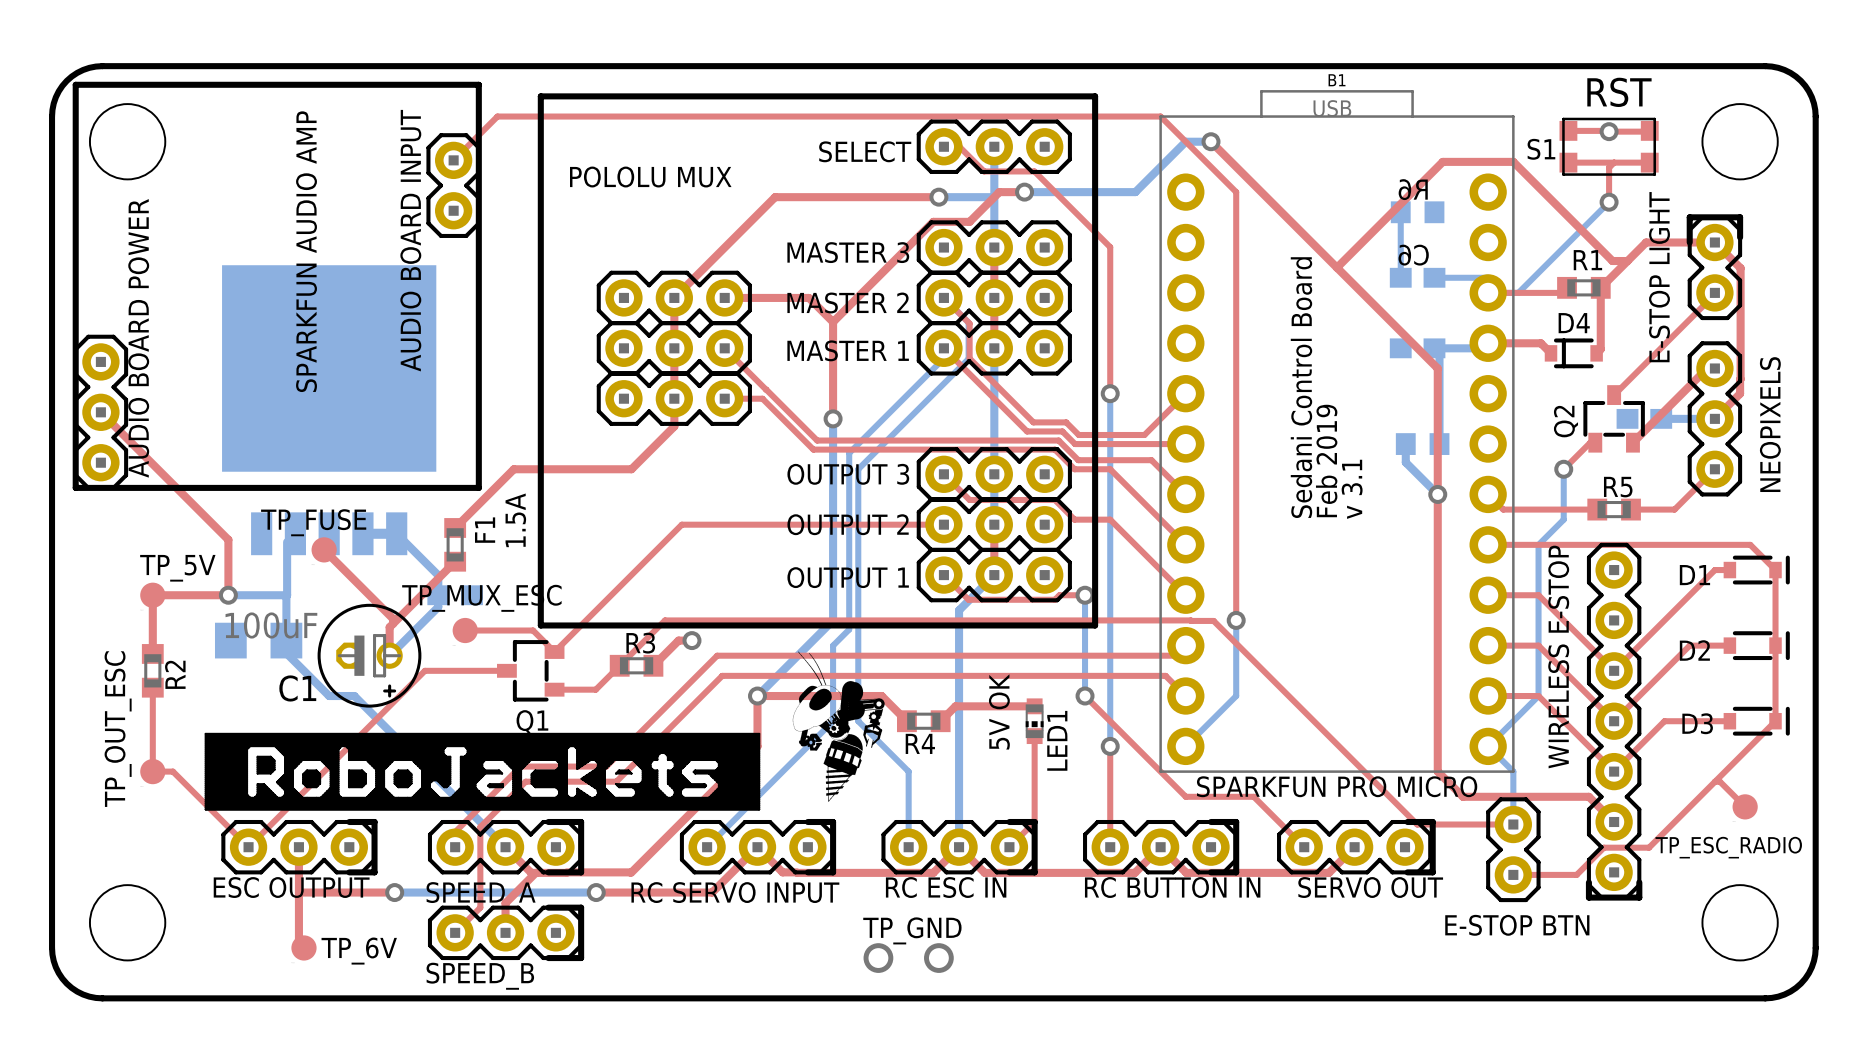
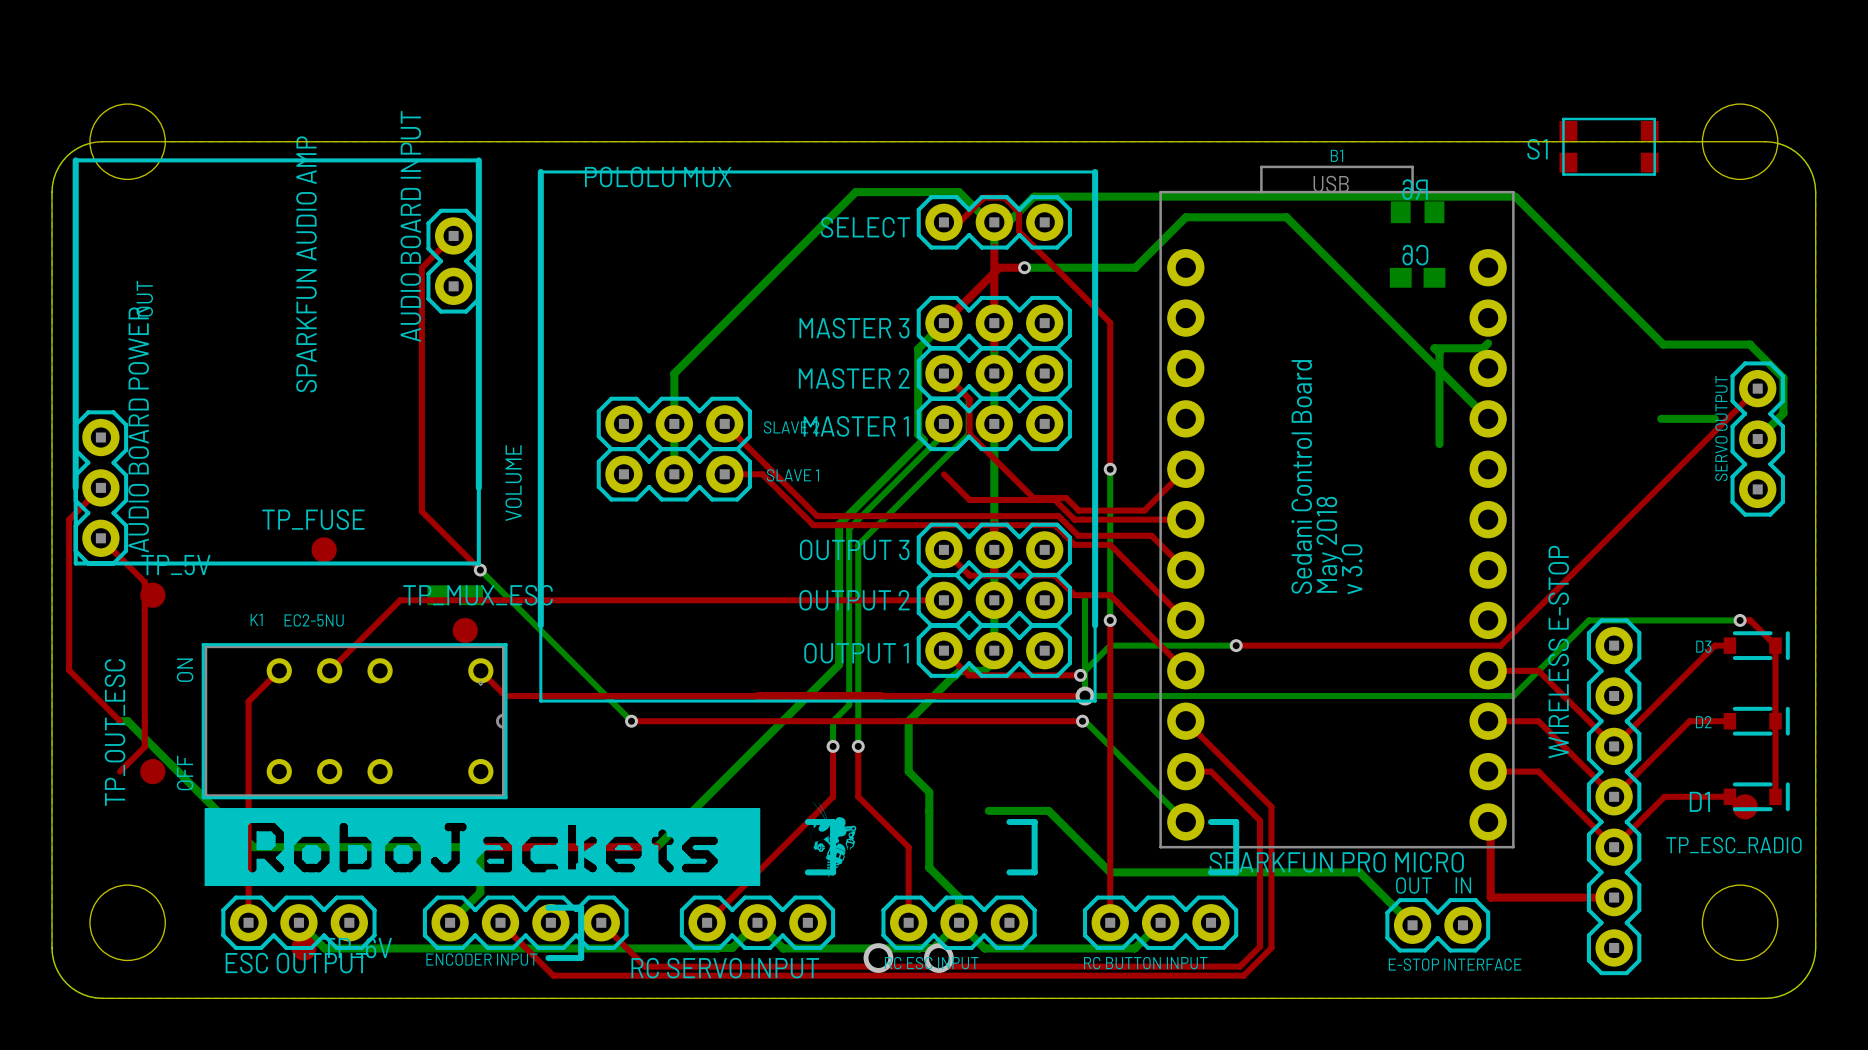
text: RST (1619, 92) -> none
top track: (1568, 130) (1649, 130) -> none
via: (1609, 131) -> none
top track: (1211, 141) (1437, 368) (1437, 771) (1462, 796) (1588, 796) (1614, 821) -> none
bottom track: (1211, 141) (1185, 141) (1135, 192) (1024, 192) -> none
via: (1211, 141) -> none
top track: (943, 146) (959, 146) (984, 171) (1034, 171) (1110, 247) (1110, 322) -> (943, 222) (959, 222) (984, 197) (1004, 197) (1019, 212) (1019, 231) (1110, 322)
bottom track: (994, 146) (994, 222) -> none
part position: (994, 146) -> (994, 222)
line: (75, 160) (75, 84) (478, 84) (478, 160) -> (75, 160) (478, 160)
top track: (453, 160) (497, 116) (1160, 116) (1236, 192) (1236, 620) -> none
top track: (1568, 162) (1649, 162) -> none
top track: (1614, 162) (1609, 167) (1609, 202) -> none
line: (540, 171) (540, 96) (1095, 96) (1095, 171) -> (540, 171) (1095, 171)
part position: (453, 185) -> (453, 261)
board edge: (52, 192) (52, 116) (55, 97) (62, 85) (71, 76) (89, 67) (102, 66) (1771, 66) (1784, 69) (1795, 76) (1805, 85) (1811, 97) (1815, 116) (1815, 192) -> (52, 192) (55, 172) (66, 156) (83, 145) (102, 141) (1765, 141) (1784, 145) (1800, 156) (1811, 172) (1815, 192)
board edge width: thick (52, 192) (52, 947) (55, 967) (66, 983) (83, 994) (102, 998) (1765, 998) (1784, 994) (1795, 987) (1805, 978) (1813, 961) (1815, 947) (1815, 192) -> thin (52, 192) (52, 947) (55, 967) (66, 983) (83, 994) (102, 998) (1765, 998) (1784, 994) (1795, 987) (1805, 978) (1813, 961) (1815, 947) (1815, 192)
top track: (1024, 192) (999, 192) (969, 221) (933, 221) (833, 322) -> none
via: (1024, 192) -> none
top track: (938, 197) (775, 197) (674, 297) (674, 426) (631, 469) (513, 469) (455, 527) -> none
bottom track: (938, 197) (994, 197) -> none
via: (938, 197) -> none
bottom track: (1609, 202) (1518, 292) (1488, 292) (1488, 277) (1434, 277) -> none
via: (1609, 202) -> none
bottom track: (1400, 212) (1400, 277) -> none
top track: none -> (453, 235) (421, 267) (421, 511) (480, 570)
line: (1740, 237) (1740, 217) (1689, 217) (1689, 242) -> none
part position: (994, 247) -> (994, 323)
top track: (1627, 261) (1612, 261) (1513, 161) (1442, 161) (1336, 267) -> none
top track: none -> (1024, 267) (999, 267) (943, 323)
bottom track: none -> (1024, 267) (1135, 267) (1185, 217) (1286, 217) (1488, 418)
via: none -> (1024, 267)
part: E-STOP LIGHT (1714, 267) -> none
top track: (1567, 287) (1561, 292) (1488, 292) -> none
R1: (1583, 287) -> none
top track: (1714, 292) (1614, 395) -> none
text: none -> OUT (144, 298)
part: (674, 297) -> none
top track: (724, 297) (808, 297) (833, 322) -> none
top track: (943, 297) (969, 323) (969, 358) (1033, 422) (1066, 422) (1078, 435) (1144, 435) (1185, 393) -> (943, 373) (969, 399) (969, 434) (1033, 497) (1066, 497) (1078, 510) (1144, 510) (1185, 469)
bottom track: (943, 297) (968, 322) (968, 358) (858, 469) (858, 544) -> (943, 373) (968, 398) (968, 434) (858, 544)
part position: (994, 297) -> (994, 373)
top track: (833, 322) (833, 418) -> none
bottom track: none -> (943, 323) (918, 348) (918, 434) (923, 439) (839, 524) (839, 664) (656, 847)
top track: (1488, 343) (1540, 343) (1551, 353) -> none
part: (674, 348) -> none
top track: (724, 348) (817, 440) (1058, 440) (1078, 460) (1151, 460) (1185, 494) -> none
top track: (943, 348) (1027, 431) (1062, 431) (1075, 444) (1185, 444) -> none
bottom track: (943, 348) (943, 358) (849, 453) (849, 528) -> (943, 423) (943, 433) (849, 528)
part position: (994, 348) -> (994, 423)
part: (1417, 348) -> none
D4: (1573, 353) -> none
top track: (1596, 353) (1600, 349) (1600, 287) (1646, 242) (1714, 242) (1740, 268) (1740, 393) (1714, 418) -> none
top track: (1714, 368) (1707, 368) (1632, 442) -> none
text position: Sedani Control Board (1301, 387) -> Sedani Control Board (1301, 476)
top track: none -> (1757, 388) (1500, 645)
top track: none -> (1110, 393) (1110, 469)
bottom track: (1110, 393) (1110, 469) -> none
via: (1110, 393) -> none
part: (674, 398) -> none
top track: (724, 398) (762, 398) (813, 449) (1054, 449) (1074, 469) (1110, 469) (1185, 544) -> (724, 474) (762, 474) (813, 525) (1054, 525) (1074, 544) (1110, 544) (1185, 620)
part: (329, 410) -> none
top track: (100, 412) (228, 539) (228, 595) (152, 595) (152, 653) -> none
part position: (100, 412) -> (100, 487)
bottom track: (833, 418) (833, 620) (757, 696) -> none
via: (833, 418) -> none
Q2: (1614, 418) -> none
part: (1644, 418) -> none
part: NEOPIXELS (1714, 418) -> none
part: none -> SLAVE 2 (674, 423)
top track: none -> (724, 423) (766, 465)
B1 position: (1336, 431) -> (1336, 507)
bottom track: none -> (1757, 439) (1783, 413) (1783, 377) (1749, 344) (1663, 344) (1515, 196) (1034, 196) (1008, 222) (989, 222) (959, 192) (855, 192) (674, 373) (674, 474)
part: none -> SERVO OUTPUT (1757, 439)
top track: (1595, 442) (1590, 442) (1563, 469) -> none
bottom track: (1405, 444) (1405, 462) (1437, 494) -> none
part: (1422, 444) -> none
text: Feb 2019 (1326, 460) -> none
top track: none -> (766, 465) (817, 516) (1058, 516) (1078, 535) (1151, 535) (1185, 570)
via: none -> (1110, 469)
bottom track: (1563, 469) (1563, 519) (1538, 544) (1538, 696) (1488, 746) (1513, 771) (1513, 824) -> none
via: (1563, 469) -> none
top track: (1714, 469) (1674, 509) (1630, 509) -> none
part: none -> SLAVE 1 (674, 474)
part position: (994, 474) -> (994, 549)
text: none -> VOLUME (513, 483)
line: (75, 487) (478, 487) -> (75, 487) (75, 563) (478, 563) (478, 487)
top track: none -> (100, 487) (69, 519) (69, 670) (120, 721)
text: v 3.1 (1352, 489) -> v 3.0 (1352, 569)
via: (1437, 494) -> none
top track: (1488, 494) (1503, 509) (1597, 509) -> none
R5: (1614, 509) -> none
top track: (1110, 519) (1185, 595) -> (1110, 519) (1185, 519)
text: 1.5A (515, 520) -> none
top track: (943, 524) (681, 524) (554, 651) (533, 630) (465, 630) -> none
bottom track: none -> (994, 524) (994, 660) (984, 670) (960, 670) (908, 721) (908, 771) (929, 792) (929, 867) (959, 897) (959, 922)
part position: (994, 524) -> (994, 600)
bottom track: (295, 533) (287, 542) (287, 595) -> none
bottom track: (362, 533) (396, 533) (438, 575) (438, 607) (389, 655) -> none
text: none -> May 2018 (1329, 544)
top track: none -> (100, 538) (144, 582) (144, 746) (120, 771)
F1: (455, 544) -> none
top track: (1488, 544) (1750, 544) (1775, 570) (1775, 645) -> (1740, 620) (1750, 620) (1775, 645)
top track: (324, 549) (393, 618) (393, 623) -> none
top track: (455, 561) (389, 627) (389, 655) -> none
bottom track: none -> (480, 570) (631, 721)
via: none -> (480, 570)
top track: (1729, 570) (1714, 570) (1614, 670) (1538, 595) (1488, 595) -> none
D1 position: (1756, 570) -> (1756, 796)
top track: (943, 575) (968, 599) (1054, 599) (1059, 595) (1074, 595) -> (943, 549) (969, 575) (1054, 575) (1074, 595)
bottom track: (994, 575) (959, 610) (959, 847) -> none
part position: (994, 575) -> (994, 650)
bottom track: (228, 595) (287, 595) -> none
via: (228, 595) -> none
bottom track: (287, 595) (286, 653) (329, 696) (354, 696) (505, 847) -> none
top track: none -> (1085, 595) (1110, 595) (1185, 670)
via: (1085, 595) -> none
top track: none -> (943, 600) (400, 600) (329, 670)
top track: none -> (1110, 620) (1110, 746)
bottom track: (1110, 620) (1110, 746) -> none
via: none -> (1110, 620)
bottom track: (1236, 620) (1236, 696) (1185, 746) -> none
via: (1236, 620) -> none
bottom track: none -> (1740, 620) (1588, 620) (1513, 696) (1082, 696)
via: none -> (1740, 620)
line: (540, 625) (1095, 625) -> (540, 625) (540, 701) (1095, 701) (1095, 625)
bottom track: (849, 629) (833, 645) (833, 721) (707, 847) -> (849, 629) (849, 705) (833, 721) (833, 746)
part: (258, 640) -> none
top track: (691, 640) (678, 640) (653, 665) -> none
via: (691, 640) -> none
top track: (1185, 645) (1175, 655) (717, 655) (606, 766) (520, 766) (455, 832) (455, 847) -> none
top track: none -> (1236, 645) (1488, 645)
bottom track: none -> (1236, 645) (1110, 645) (1080, 675)
via: none -> (1236, 645)
top track: (1500, 645) (1538, 645) (1614, 721) (1689, 645) (1714, 645) -> (1488, 670) (1538, 670) (1614, 746) (1714, 645)
top track: none -> (943, 650) (968, 675) (1080, 675)
D2 name: D2 (1694, 650) -> D3 (1703, 646)
drawing: [792, 651, 885, 802] -> none
C1: 100uF (369, 655) -> none
R3: (636, 665) -> none
text: none -> ON (185, 670)
R2: (152, 670) -> none
top track: none -> (279, 670) (248, 701) (248, 922)
top track: (506, 670) (424, 670) (248, 847) (172, 771) (152, 771) (152, 687) -> none
Q1: (530, 670) -> none
via: none -> (1080, 675)
top track: (554, 689) (595, 689) (665, 620) (1213, 620) (1417, 824) (1513, 824) -> none
top track: (757, 696) (757, 746) (631, 872) (531, 872) (505, 847) -> (757, 696) (505, 696) (480, 670)
via: (757, 696) -> none
top track: (881, 696) (906, 721) -> (881, 696) (1082, 696)
top track: (1085, 696) (1185, 796) (1253, 796) (1304, 847) -> none
top track: (1185, 696) (1165, 675) (722, 675) (616, 781) (525, 781) (480, 827) (480, 907) (455, 932) -> none
top track: (1488, 696) (1538, 696) (1614, 771) (1664, 721) (1689, 721) -> (1488, 721) (1538, 721) (1614, 796) (1689, 721)
top track: (1034, 706) (955, 706) (940, 721) -> none
text: 5V OK (999, 711) -> none
bottom track: none -> (120, 721) (127, 721) (253, 847) (480, 847) (480, 892) (450, 922)
K1: none -> EC2-5NU (354, 721)
top track: none -> (631, 721) (1082, 721)
via: none -> (631, 721)
bottom track: (858, 721) (908, 771) (908, 847) -> (858, 721) (858, 746)
R4: (923, 721) -> none
LED1: (1034, 721) -> none
bottom track: none -> (1082, 721) (1085, 721) (1185, 821)
via: none -> (1082, 721)
top track: none -> (1185, 721) (1271, 806) (1271, 947) (1243, 975) (553, 975) (500, 922)
part position: (1614, 721) -> (1614, 796)
top track: (1775, 721) (1649, 847) (1603, 847) (1576, 874) (1513, 874) -> (1775, 721) (1775, 796)
D3 name: D3 (1697, 723) -> D2 (1703, 722)
top track: (1034, 736) (1034, 821) (1009, 847) -> none
top track: none -> (833, 746) (833, 796) (707, 922)
via: none -> (833, 746)
top track: none -> (858, 746) (858, 796) (908, 847) (908, 922)
via: none -> (858, 746)
via: (1110, 746) -> none
drawing position: (482, 771) -> (482, 847)
top track: none -> (1185, 771) (1211, 771) (1260, 820) (1260, 946) (1240, 966) (645, 966) (601, 922)
top track: none -> (1488, 771) (1538, 771) (1614, 847) (1664, 796) (1729, 796)
text: none -> OFF (185, 773)
top track: (1714, 781) (1720, 781) (1745, 806) -> none
drawing: none -> [810, 802, 857, 878]
bottom track: none -> (988, 810) (1048, 810) (1110, 872) (1359, 872) (1412, 925)
line: (1407, 821) (1432, 821) (1432, 872) (1407, 872) -> none
top track: none -> (1488, 821) (1490, 824) (1490, 897) (1614, 897)
top track: (298, 847) (298, 942) (303, 947) -> none
part position: (298, 847) -> (298, 922)
top track: none -> (480, 847) (656, 847)
part: SPEED_A (505, 847) -> none
part position: (757, 847) -> (757, 922)
part: RC ESC IN (959, 847) -> none
top track: none -> (1110, 847) (1110, 922)
part: RC BUTTON IN (1160, 847) -> none
top track: (1354, 847) (1328, 872) (1186, 872) (1160, 847) (1134, 872) (984, 872) (959, 847) (933, 872) (782, 872) (757, 847) (712, 892) (596, 892) -> none
part: SERVO OUT (1354, 847) -> none
part: E-STOP BTN (1513, 849) -> none
top track: (535, 872) (505, 903) (505, 932) -> none
line: (1588, 882) (1588, 897) (1639, 897) (1639, 882) -> none
text: none -> OUT (1413, 885)
text: none -> IN (1463, 885)
top track: (298, 892) (394, 892) -> none
bottom track: (394, 892) (596, 892) -> none
via: (394, 892) -> none
via: (596, 892) -> none
bottom track: none -> (298, 922) (324, 948) (732, 947) (757, 922) (783, 948) (933, 947) (959, 922)
part: none -> ENCODER INPUT (525, 922)
bottom track: none -> (959, 922) (984, 948) (1134, 948) (1160, 922)
part: none -> RC ESC INPUT (959, 922)
part: none -> RC BUTTON INPUT (1160, 922)
part: none -> E-STOP INTERFACE (1437, 925)
text: TP_GND (912, 930) -> none
part: SPEED_B (505, 932) -> none

